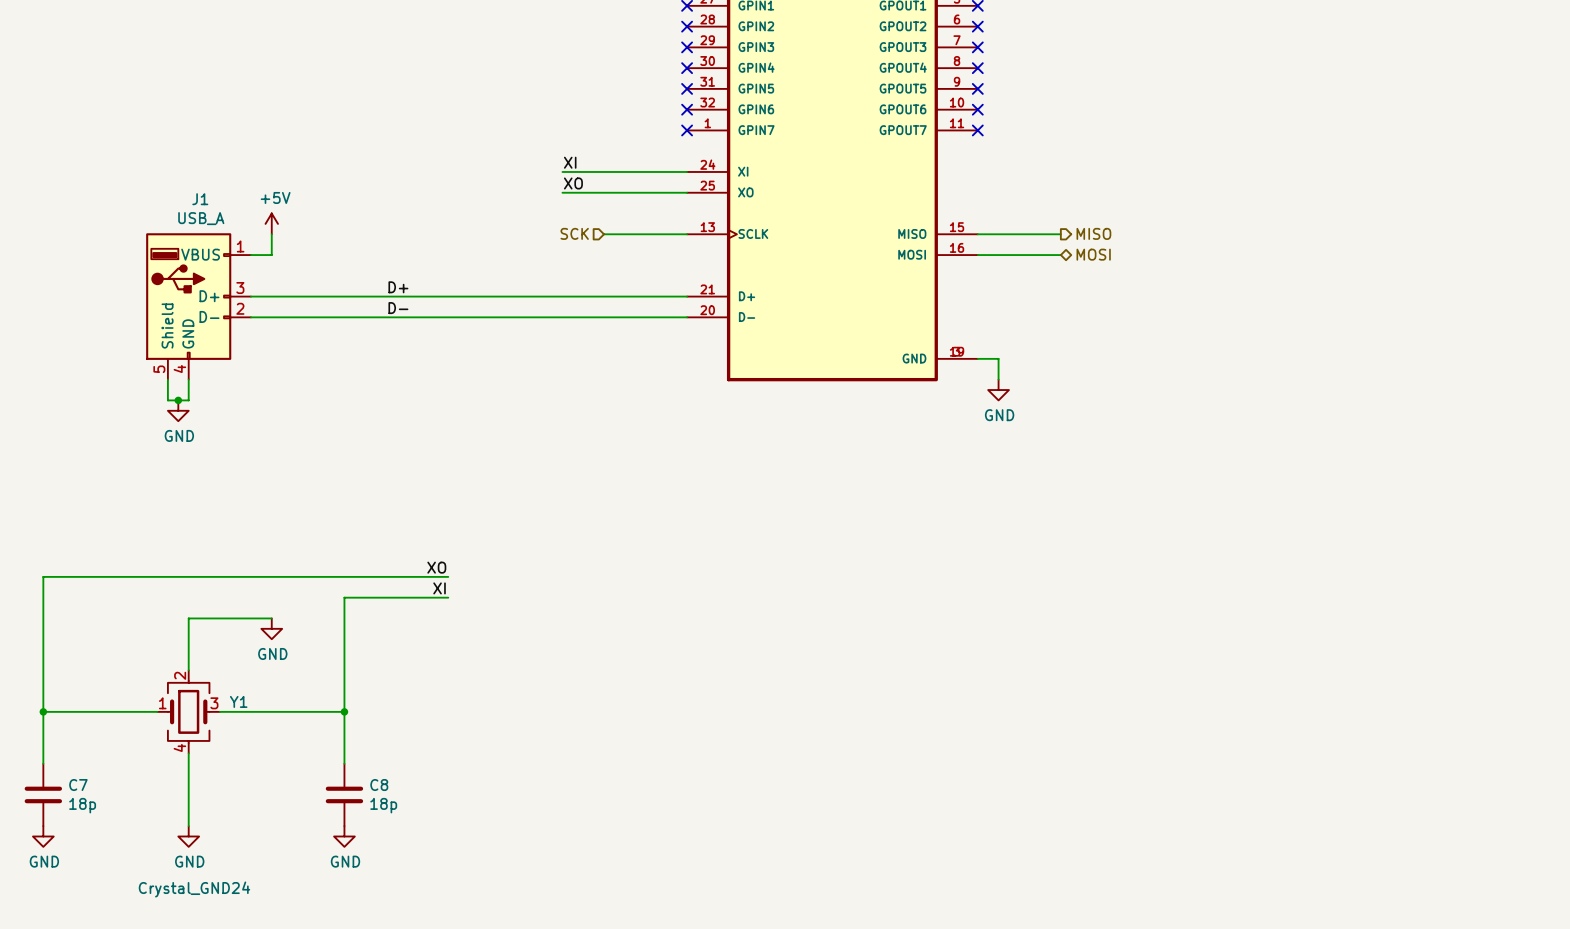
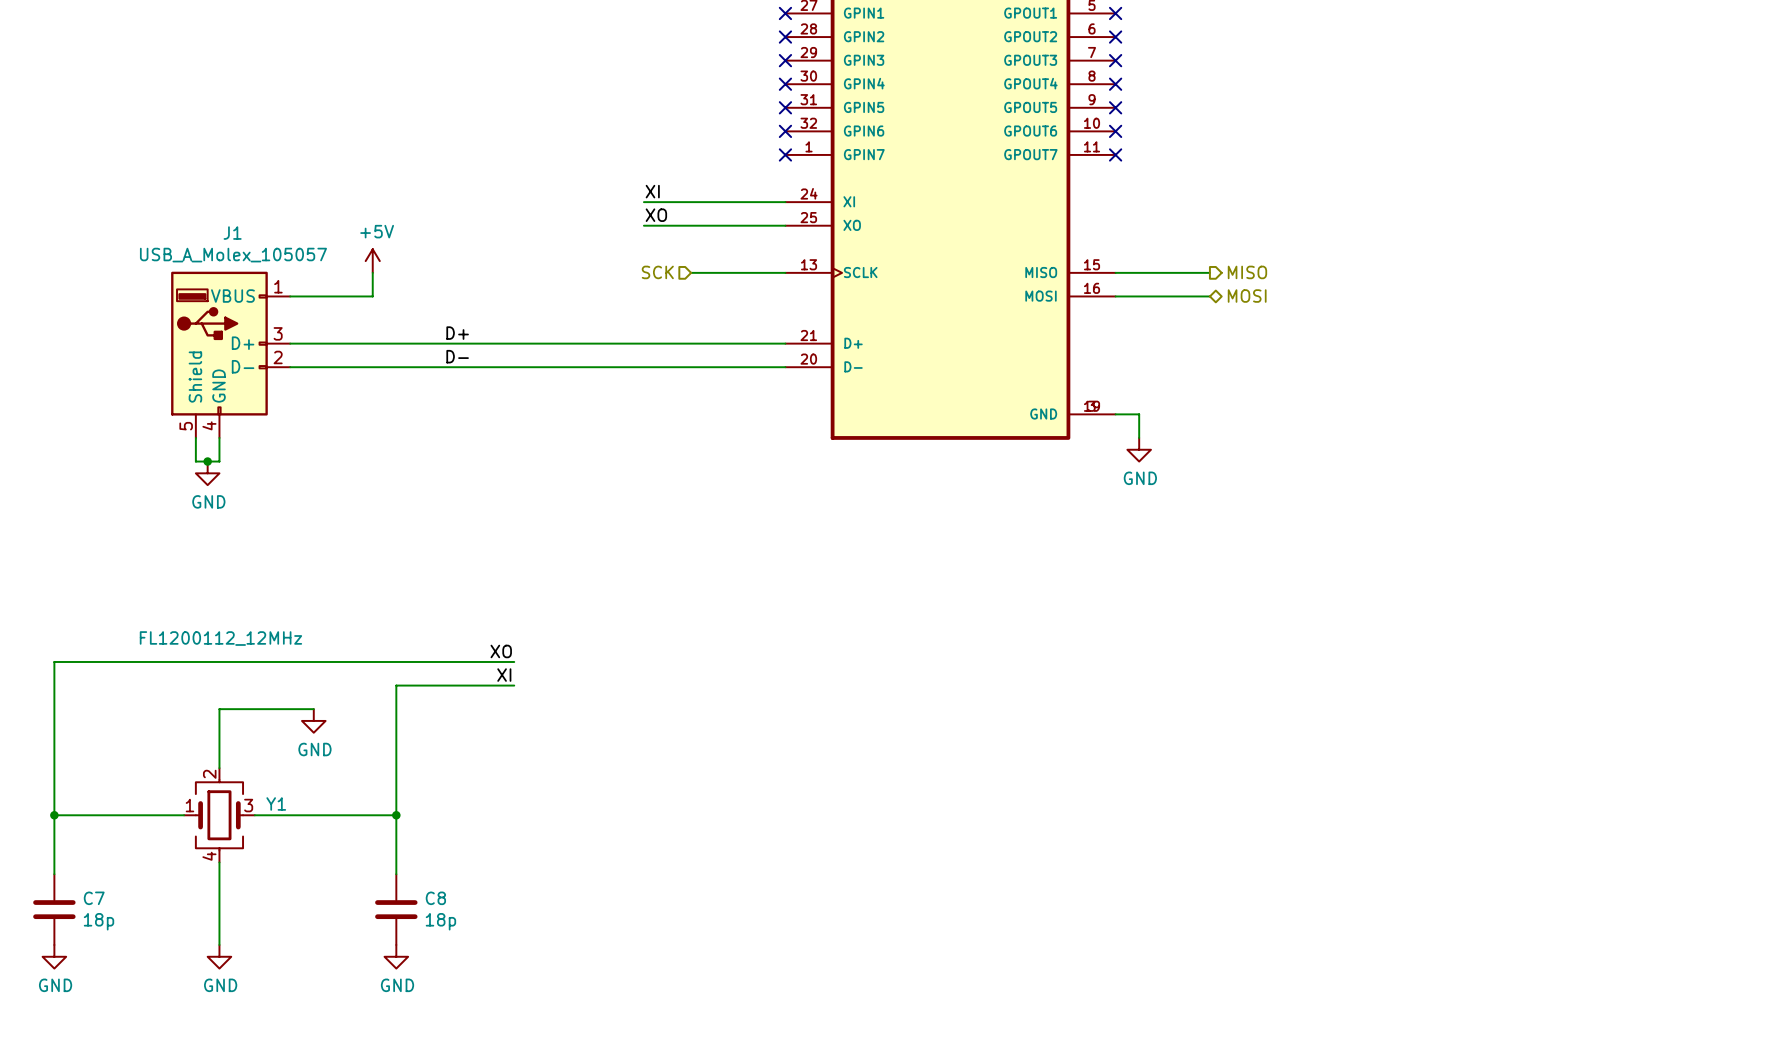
J1 value: USB_A (201, 218) -> USB_A_Molex_105057 (233, 255)
power symbol position: +5V (271, 223) -> +5V (372, 261)
wire: (271, 234) (271, 255) -> (372, 272) (372, 296) (313, 296)
Y1 value: Crystal_GND24 (194, 889) -> FL1200112_12MHz (220, 638)

